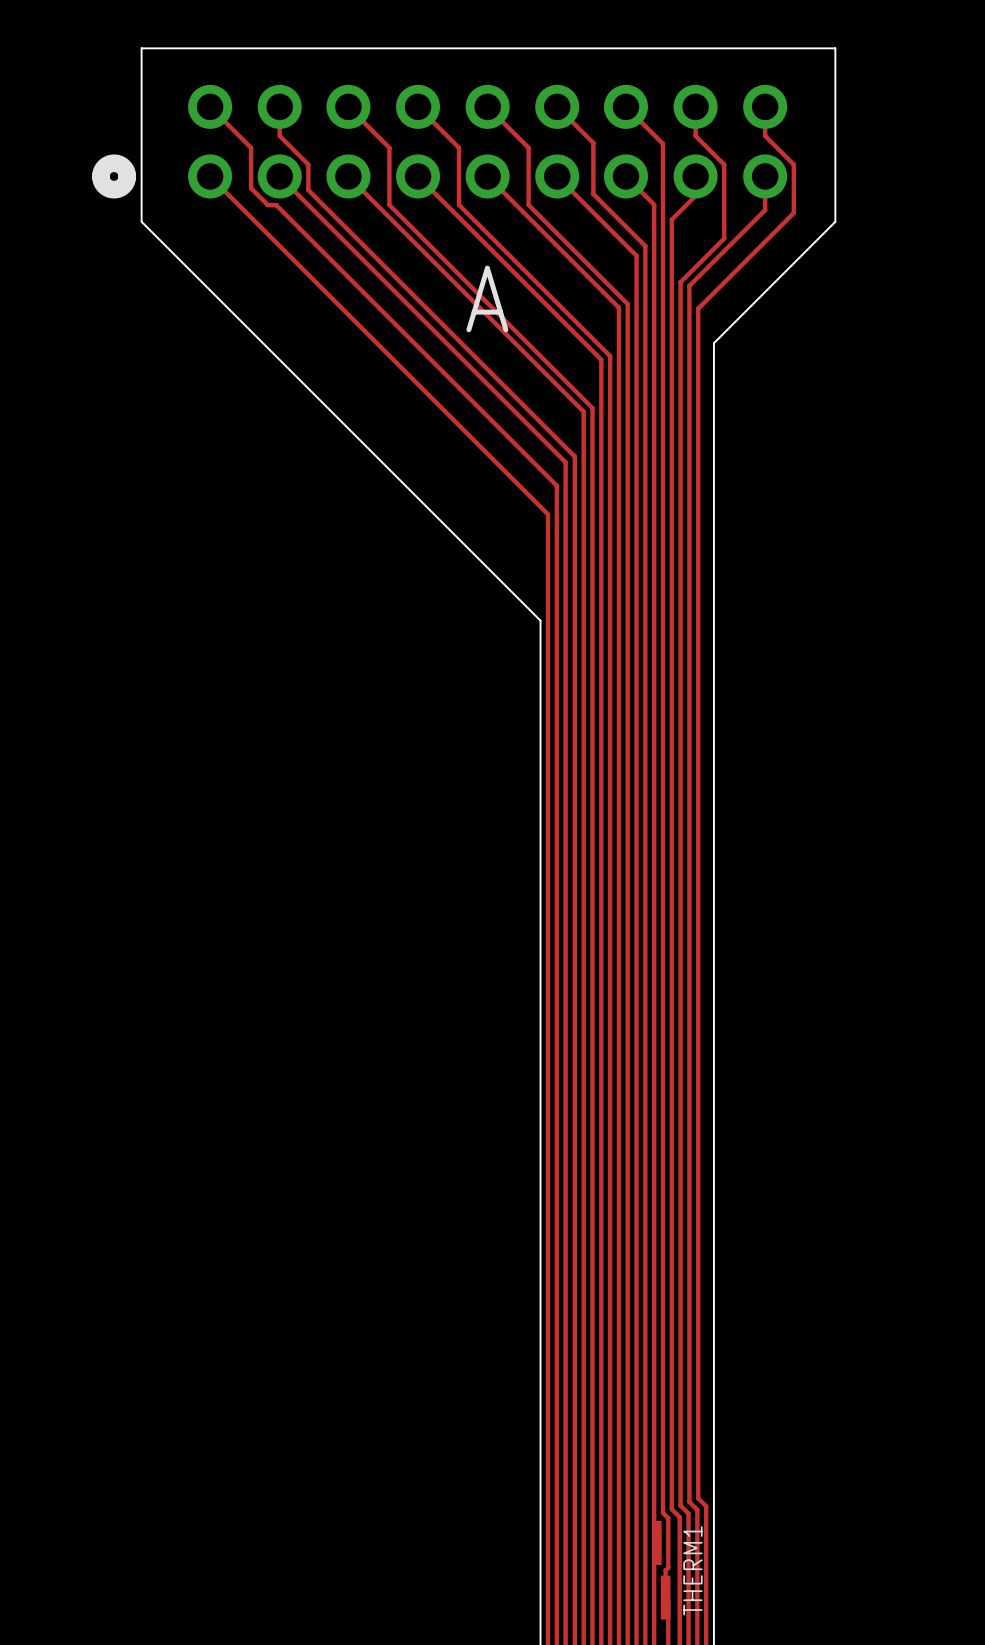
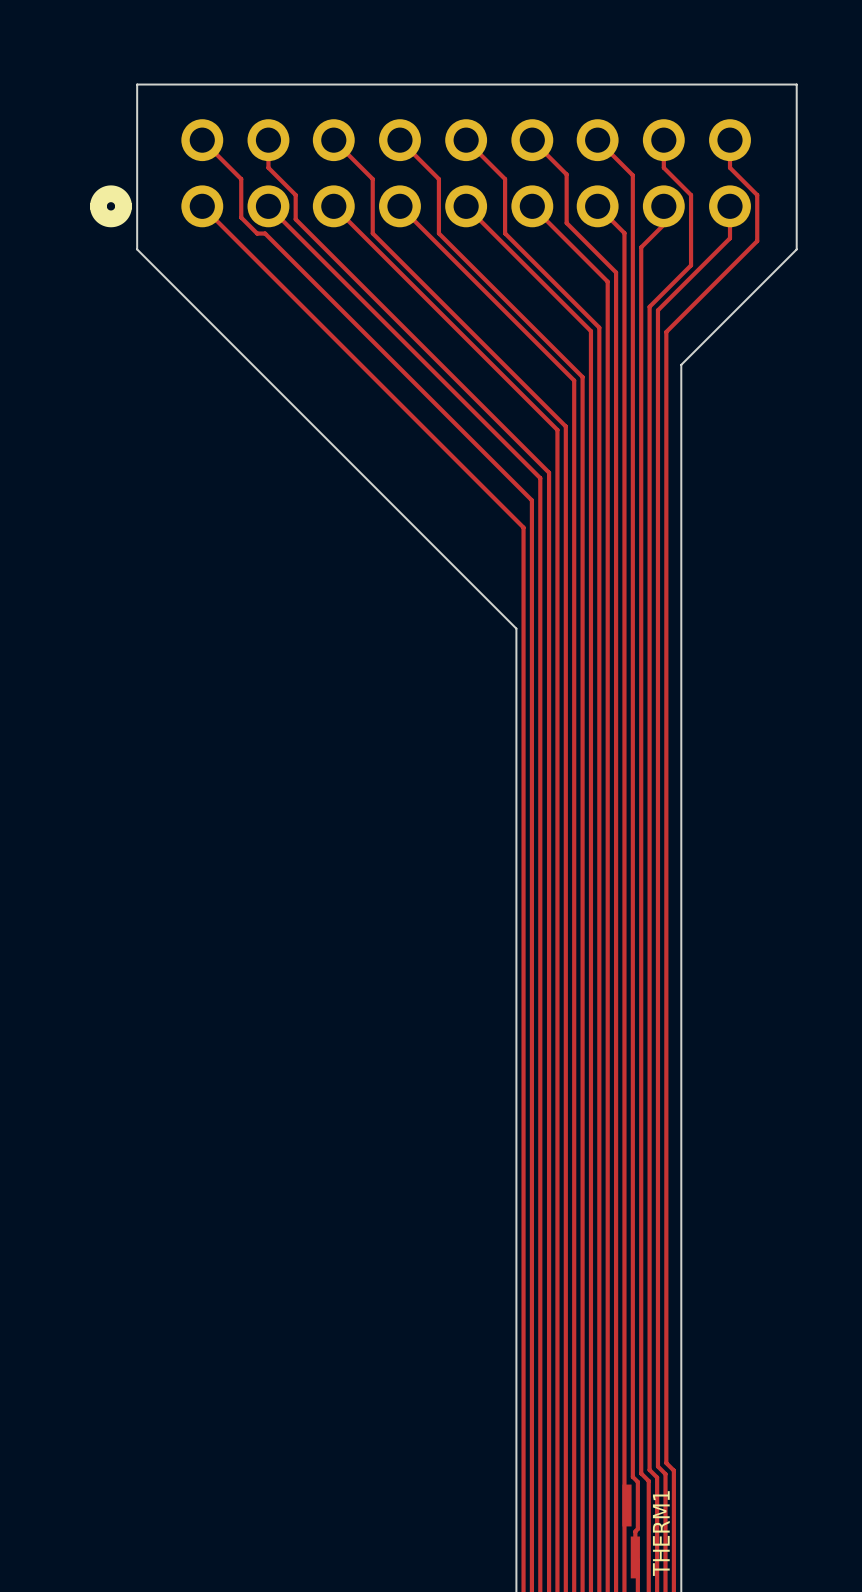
text: A (487, 298) -> none

